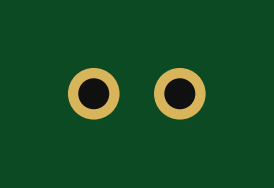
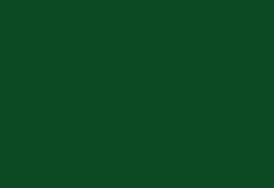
part: (136, 93) -> none

